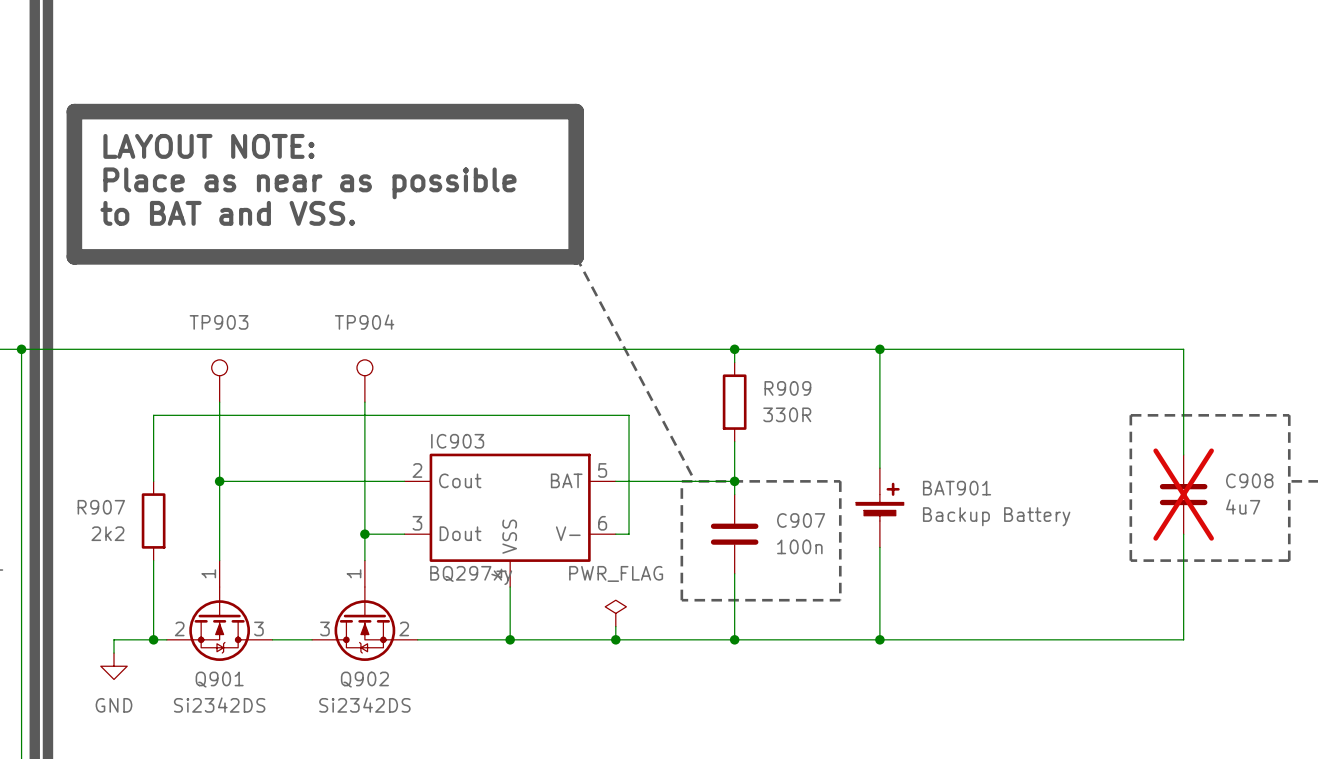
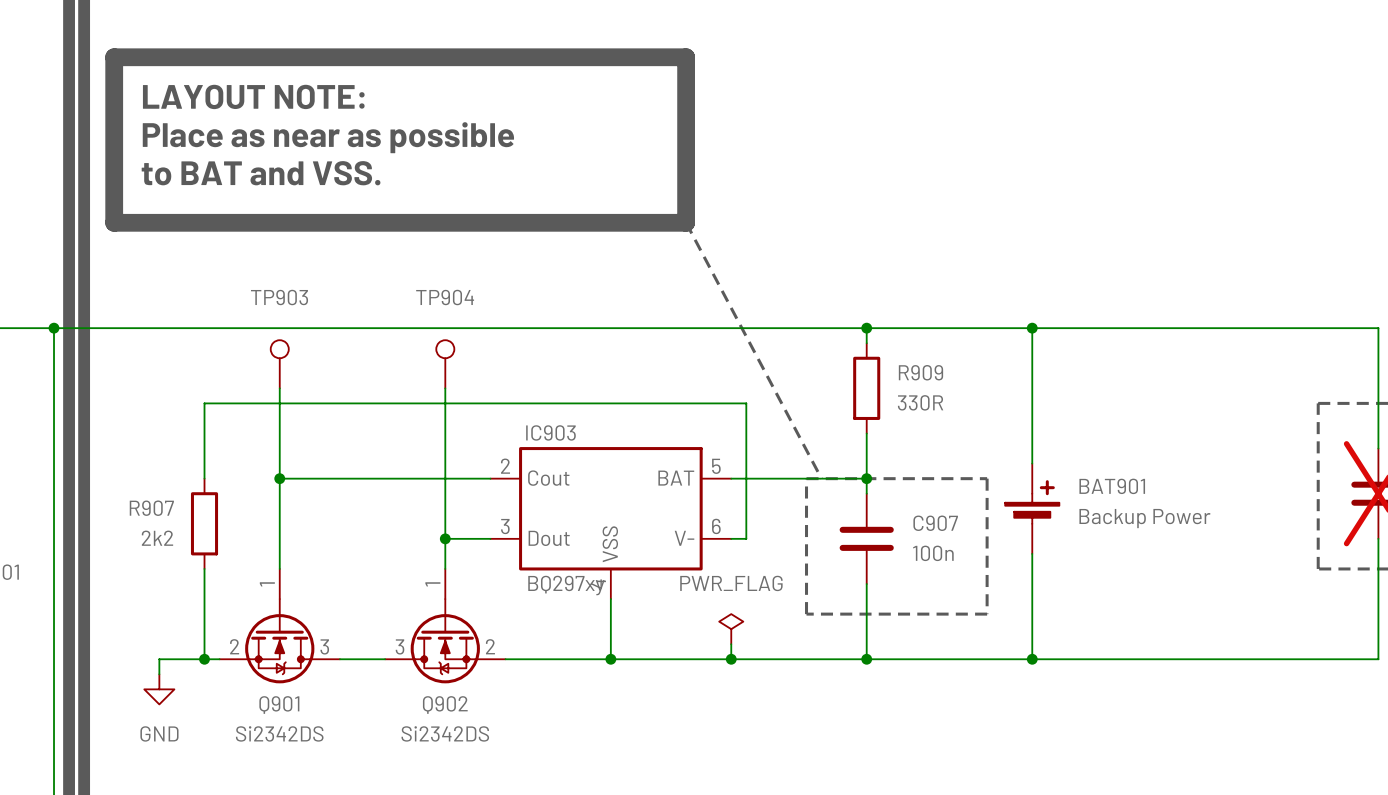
BAT901 value: Backup Battery (996, 516) -> Backup Power (1144, 518)

